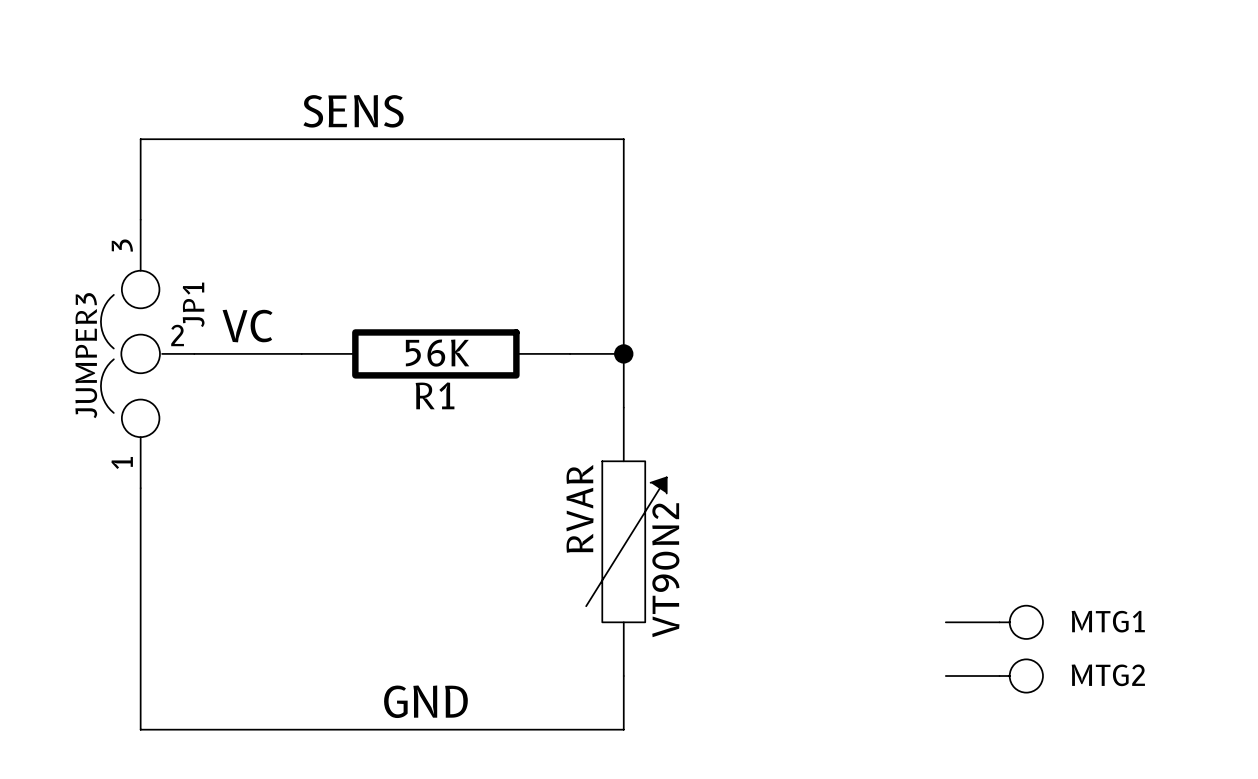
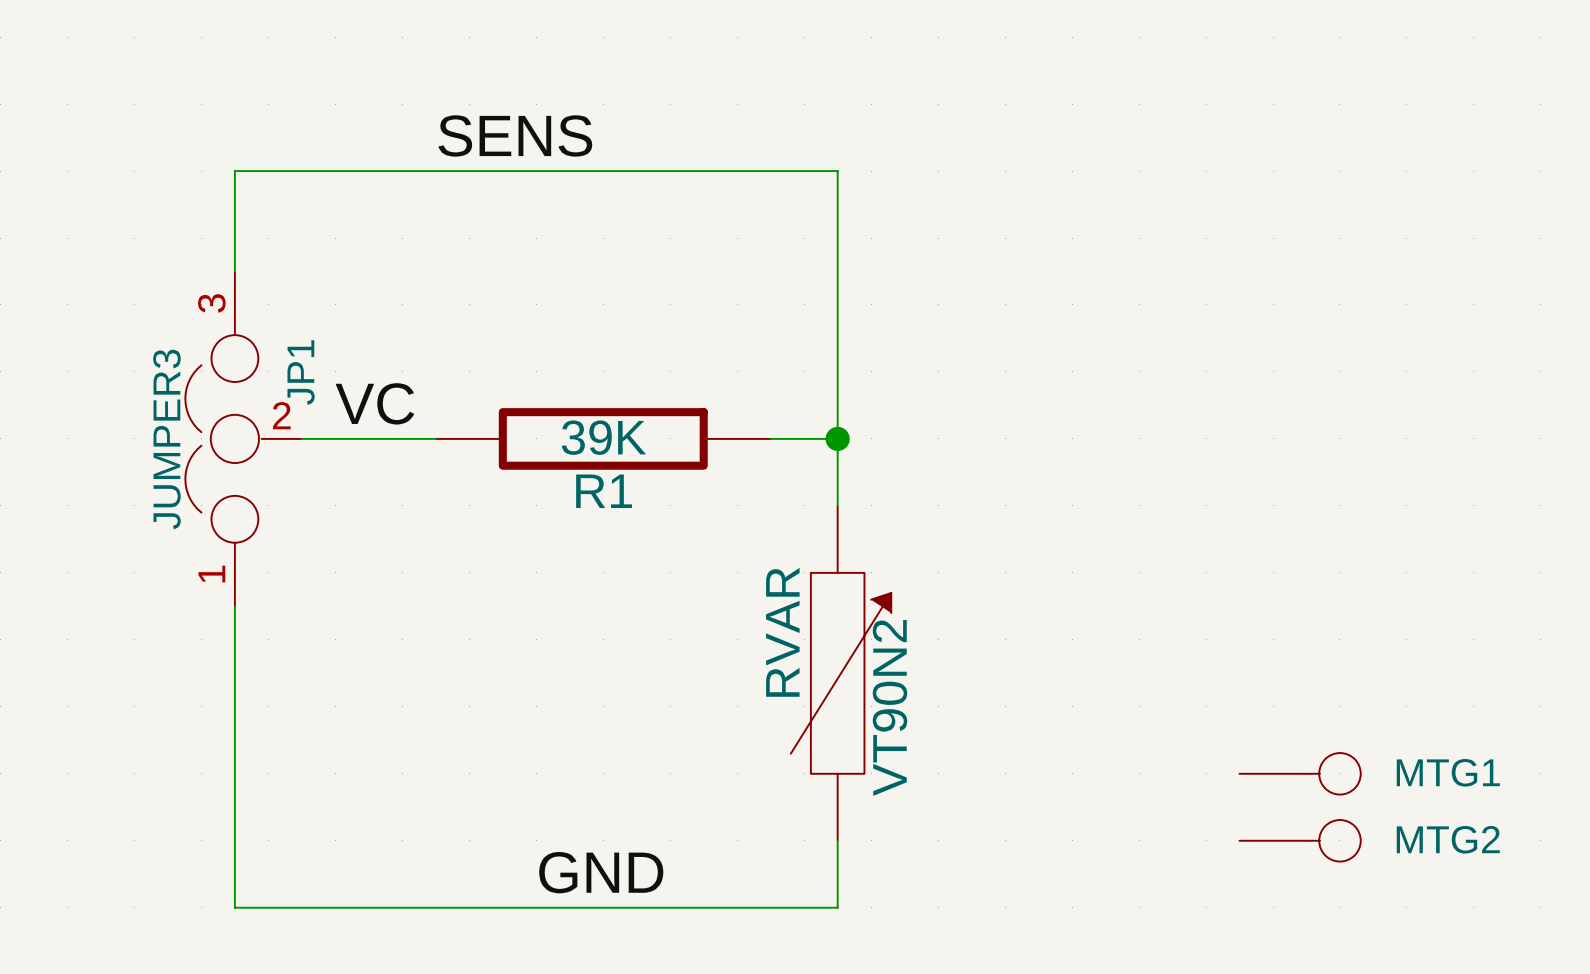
R1 value: 56K (437, 353) -> 39K (603, 437)

